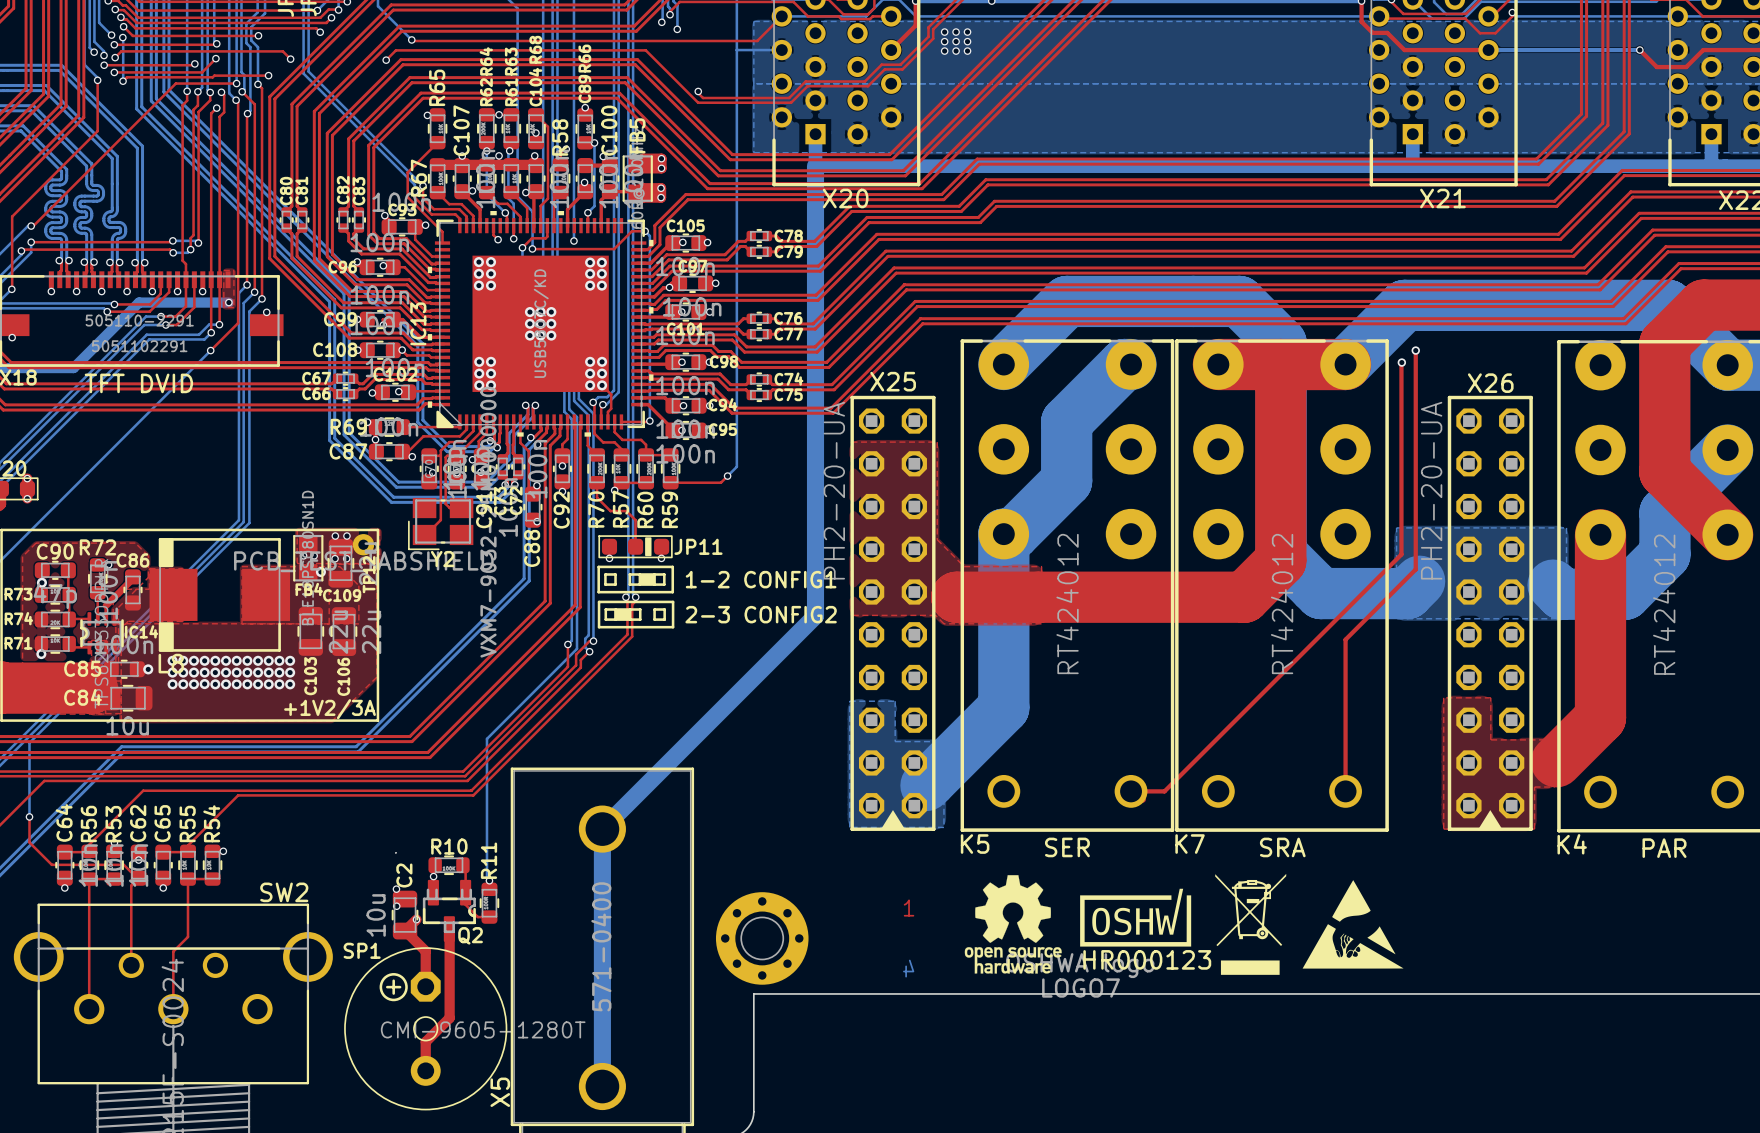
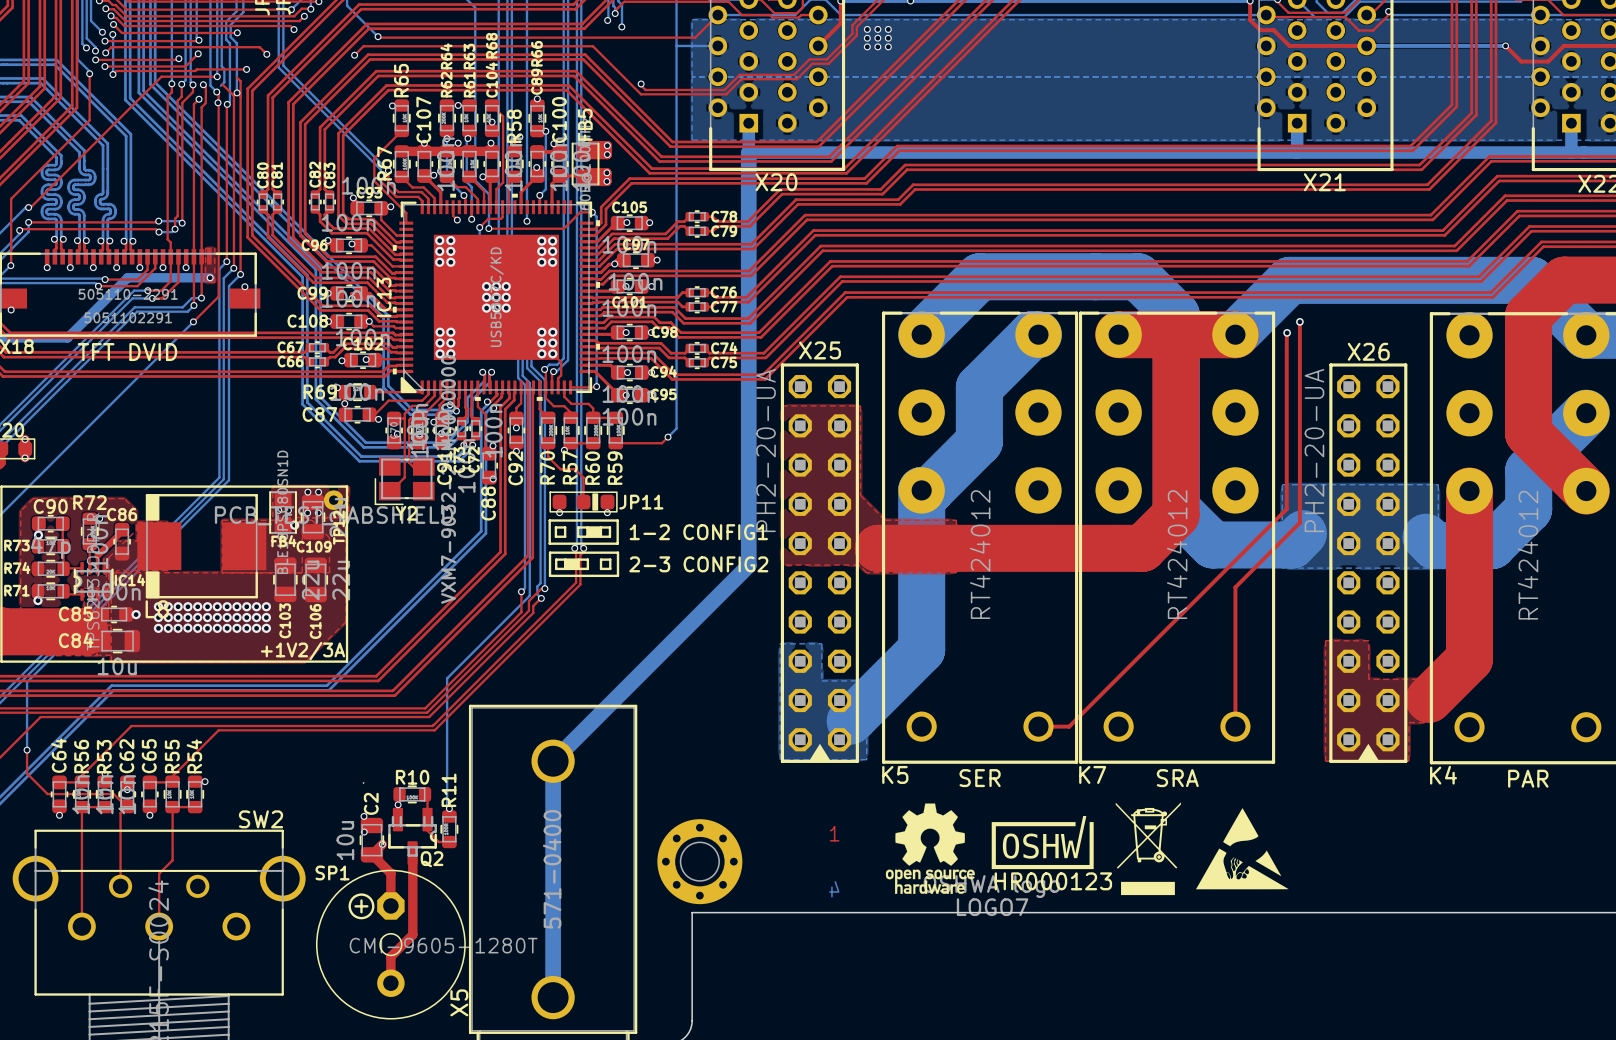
bottom track: none -> (236, 77) (236, 92)
via: (257, 84) -> none
via: (242, 91) -> none
via: none -> (237, 92)
via: none -> (218, 102)

